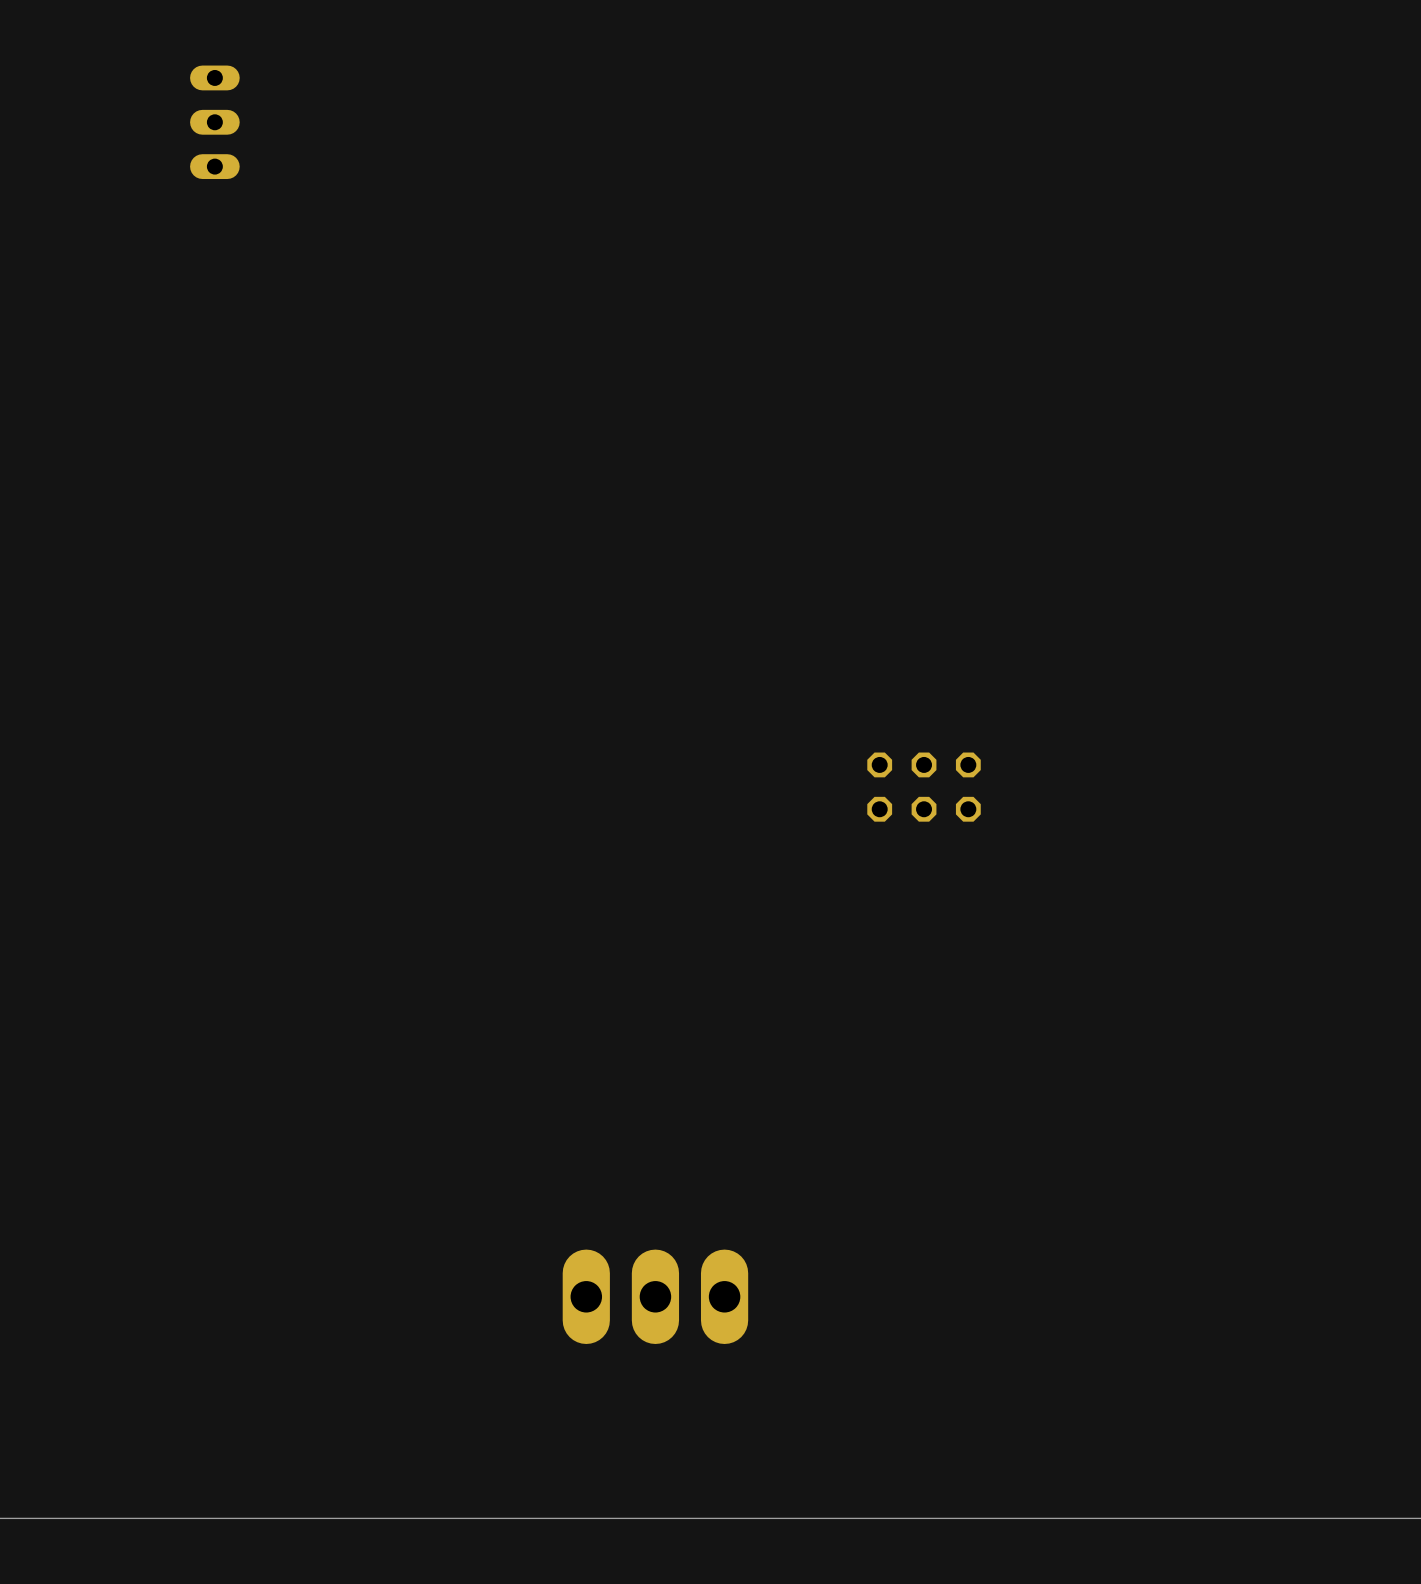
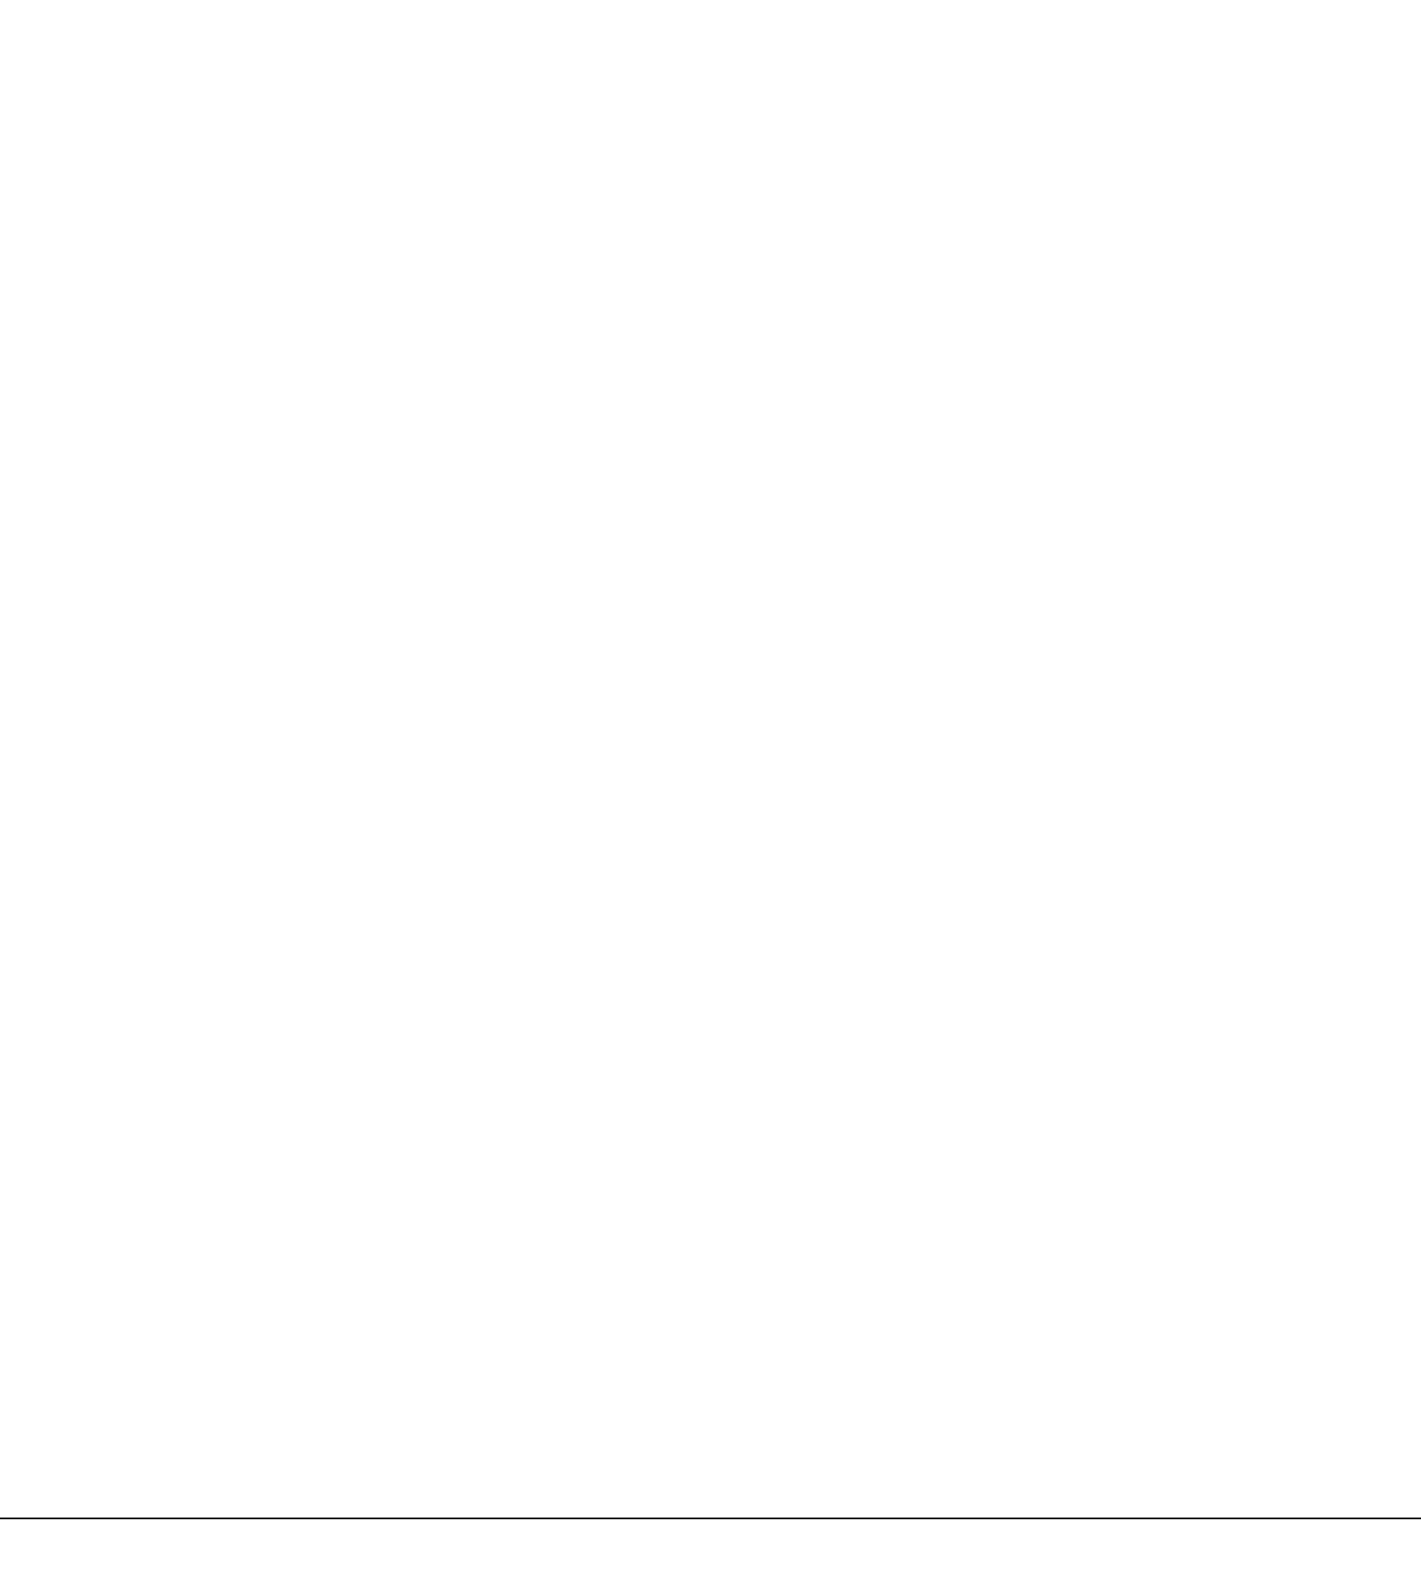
part: (214, 122) -> none
part: (924, 787) -> none
part: (655, 1296) -> none

